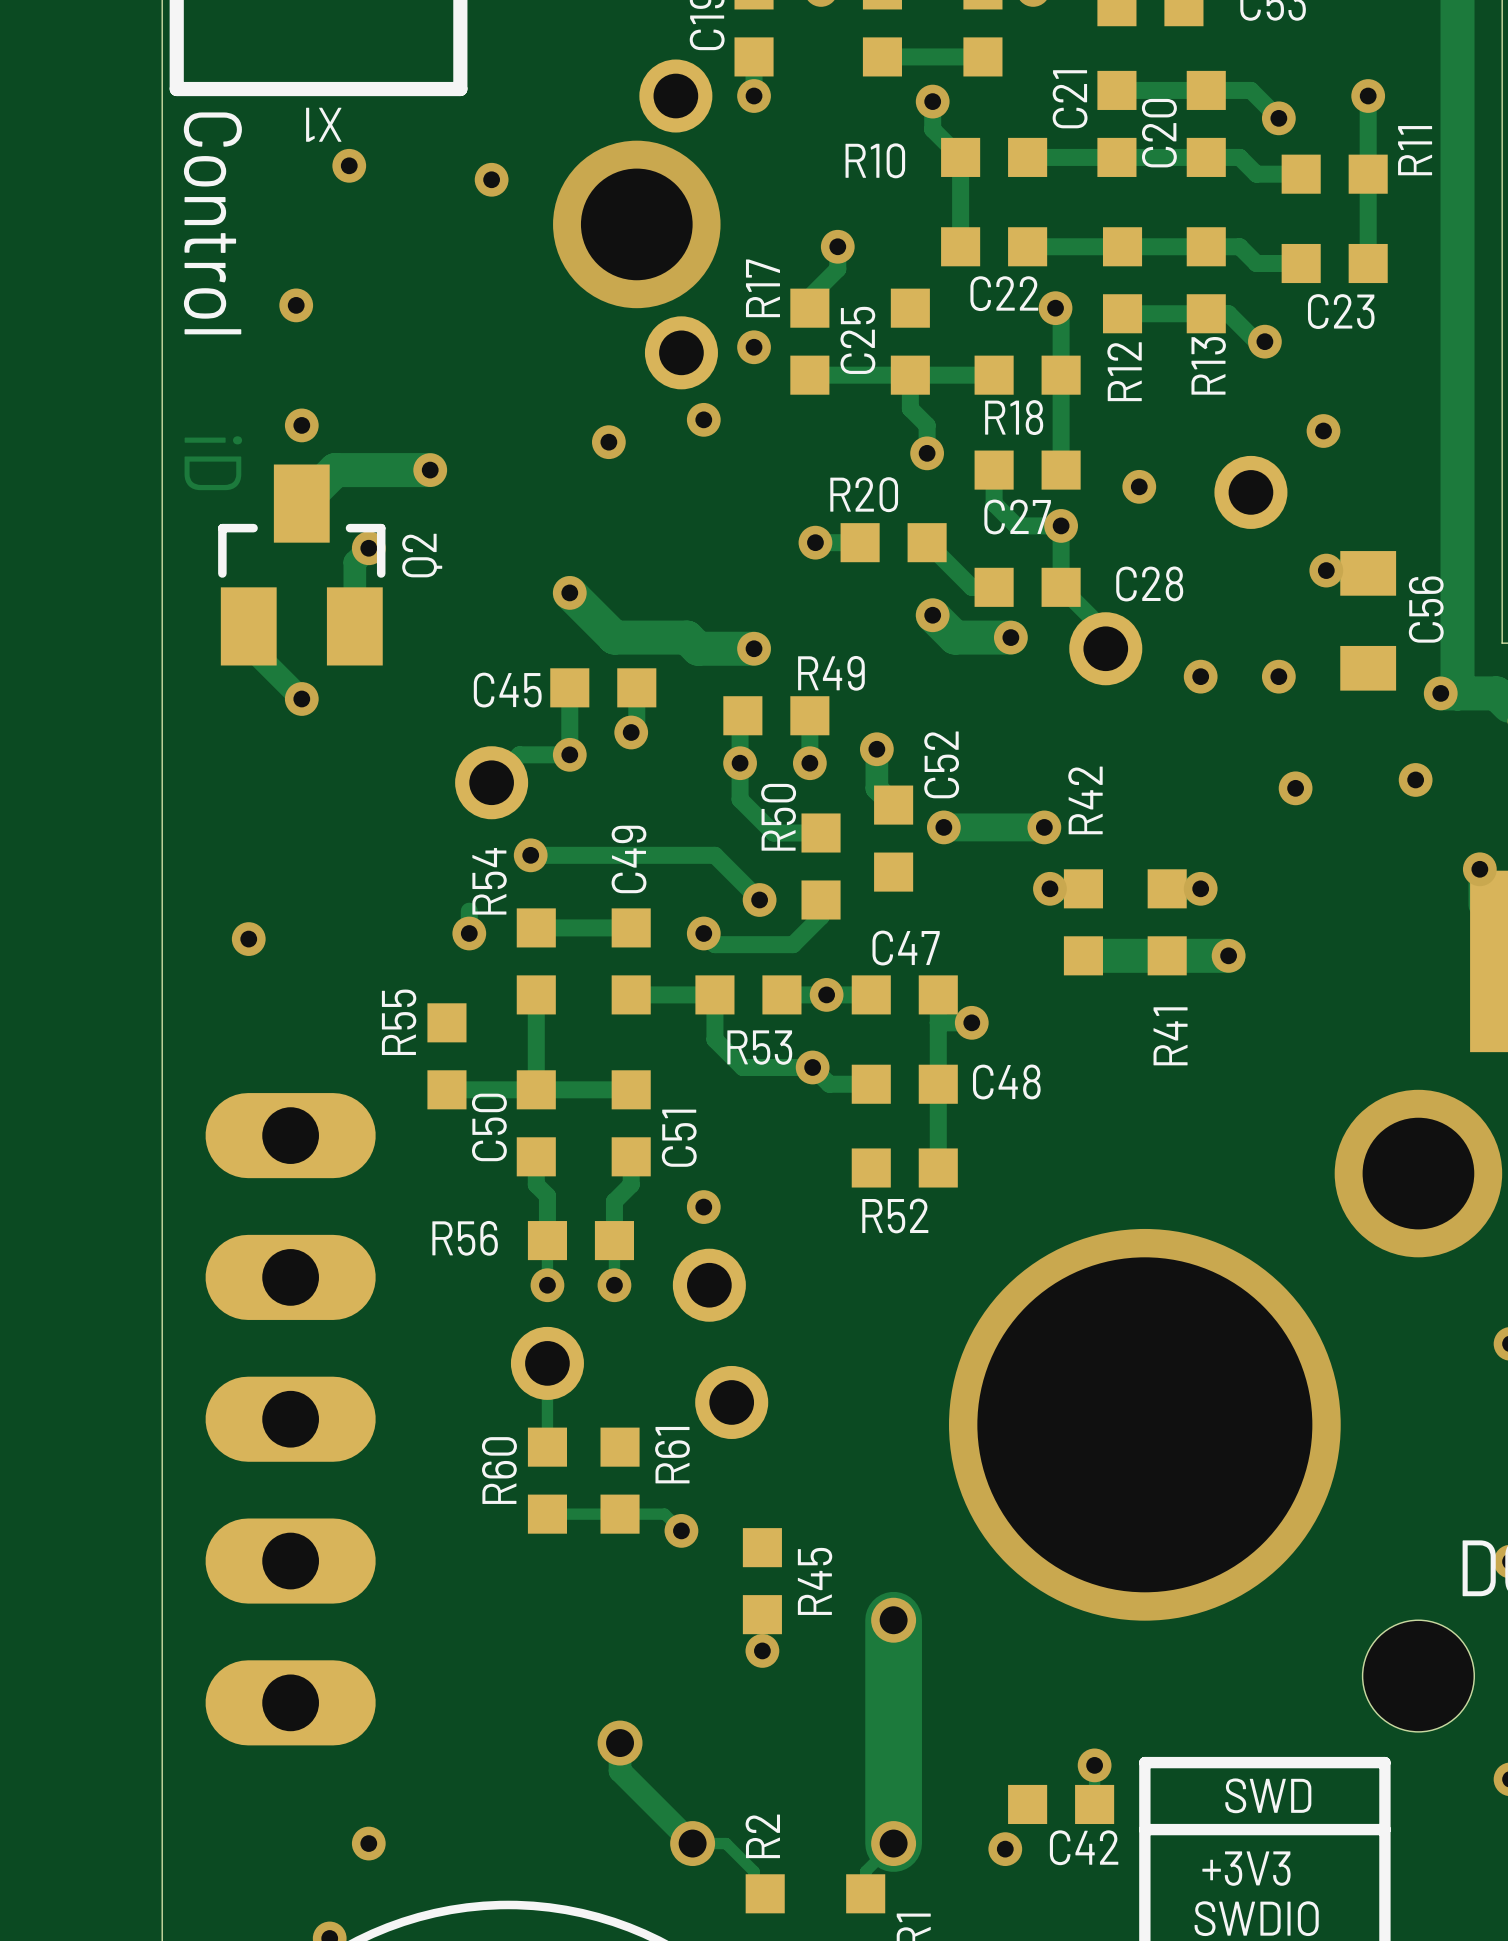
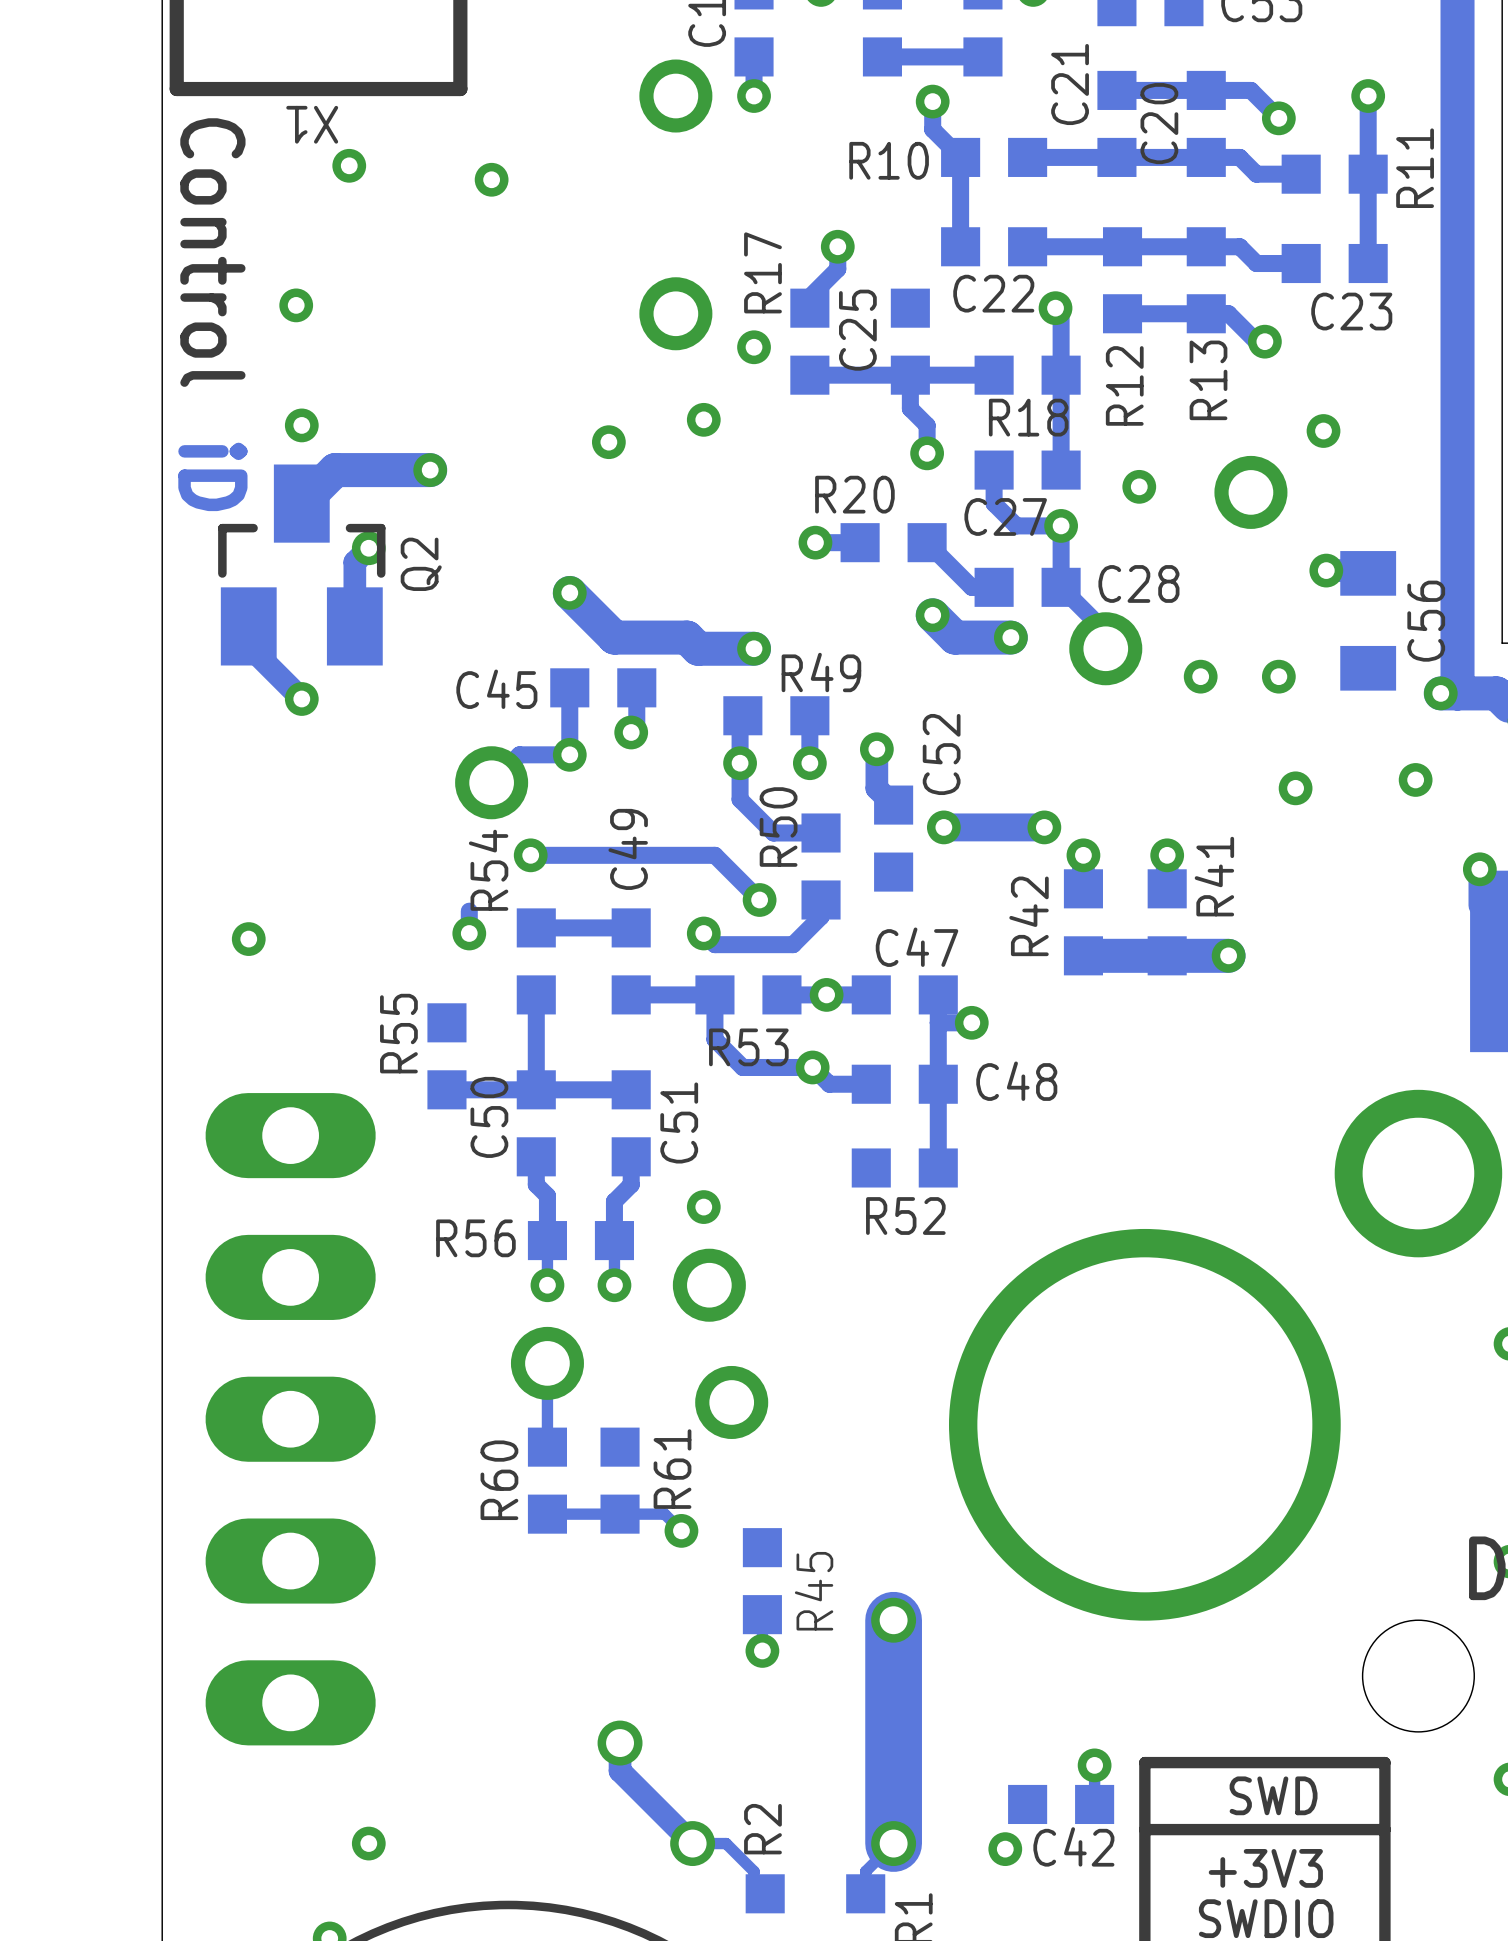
via: (636, 224) -> none
part position: (681, 352) -> (675, 313)
R42 name position: R42 (1085, 800) -> R42 (1029, 916)
via position: (1049, 888) -> (1083, 855)
via position: (1200, 888) -> (1167, 855)
R41 name position: R41 (1170, 1036) -> R41 (1214, 876)

